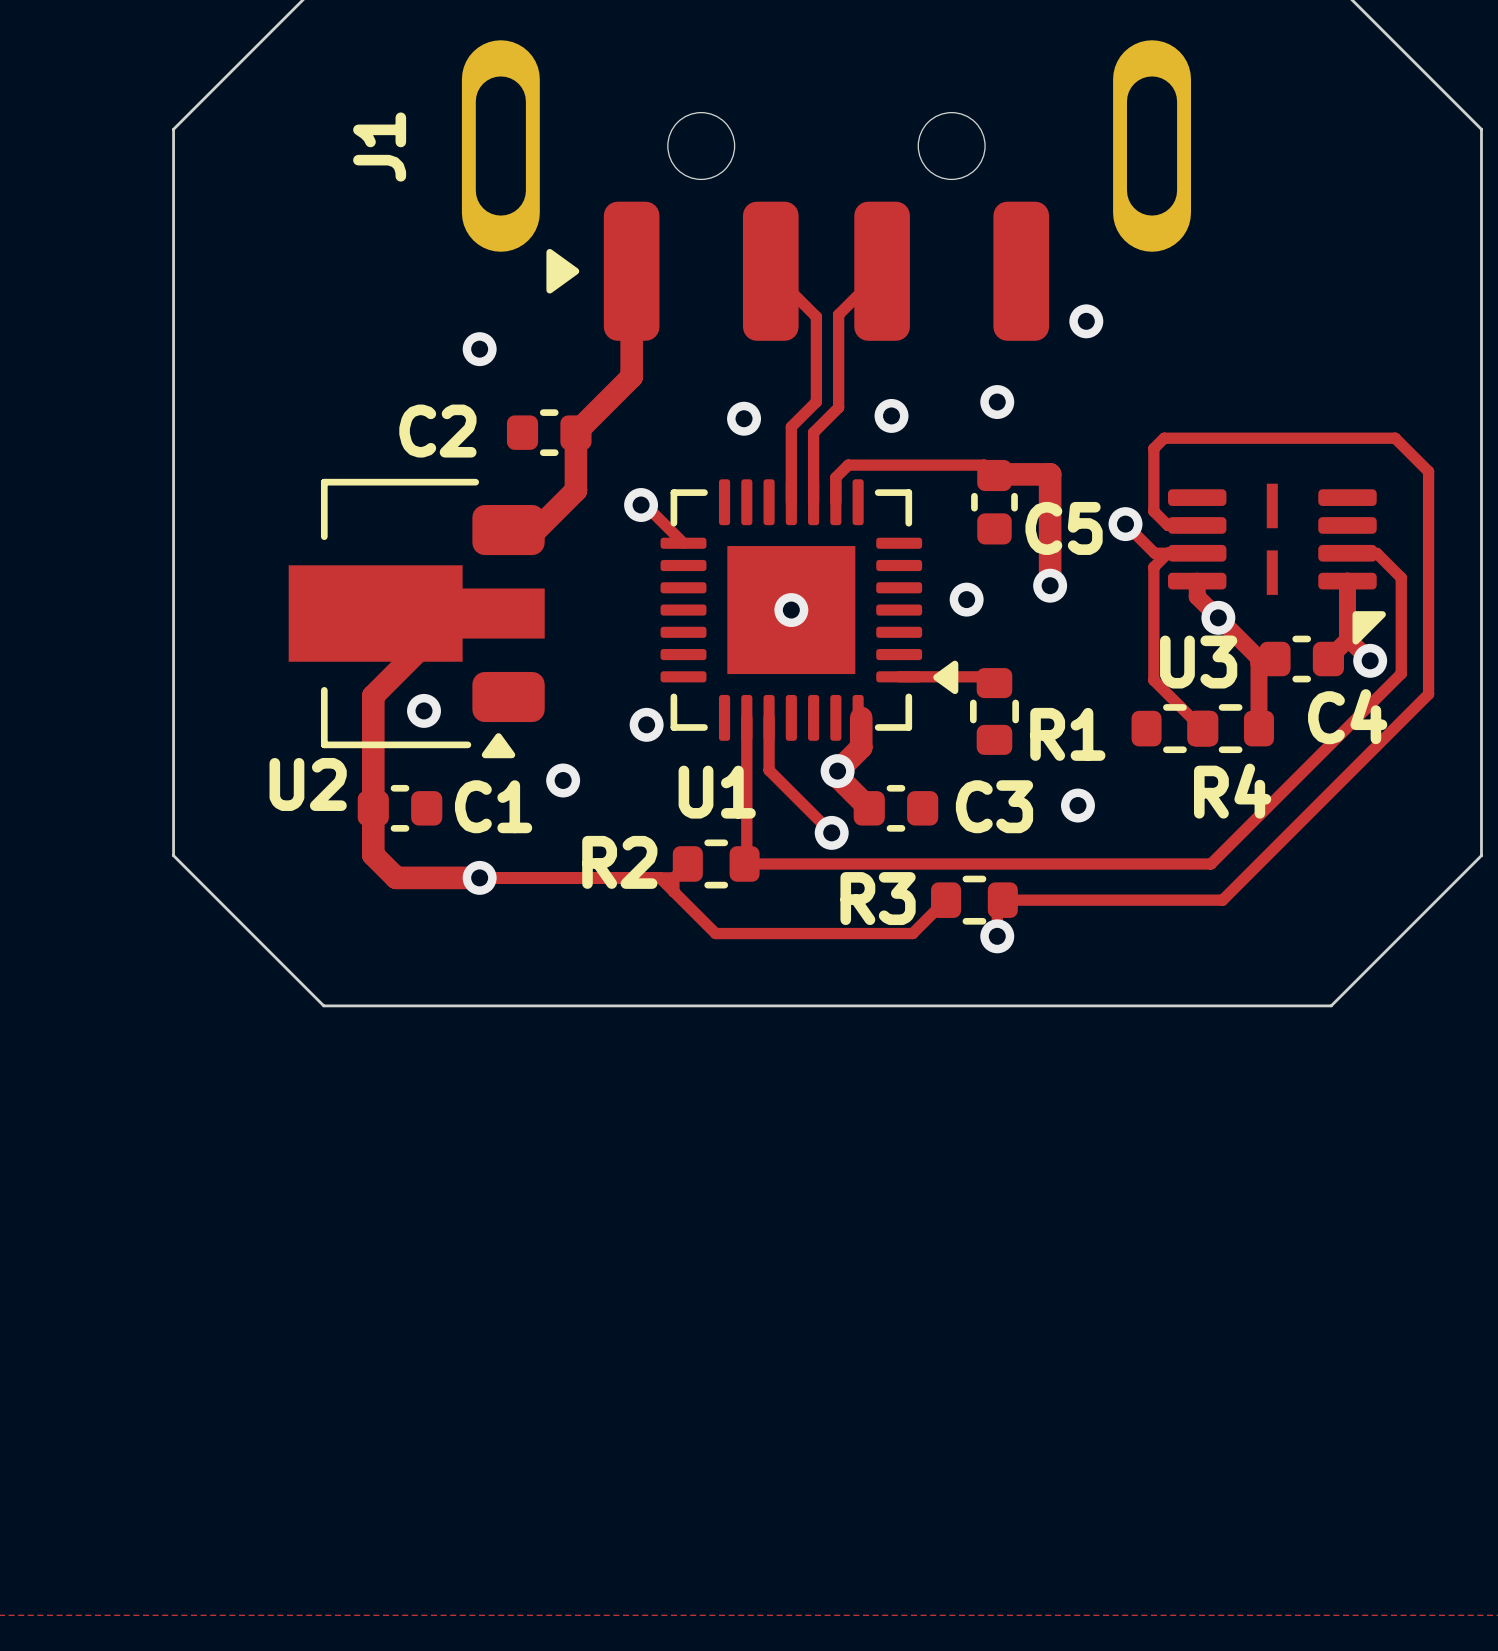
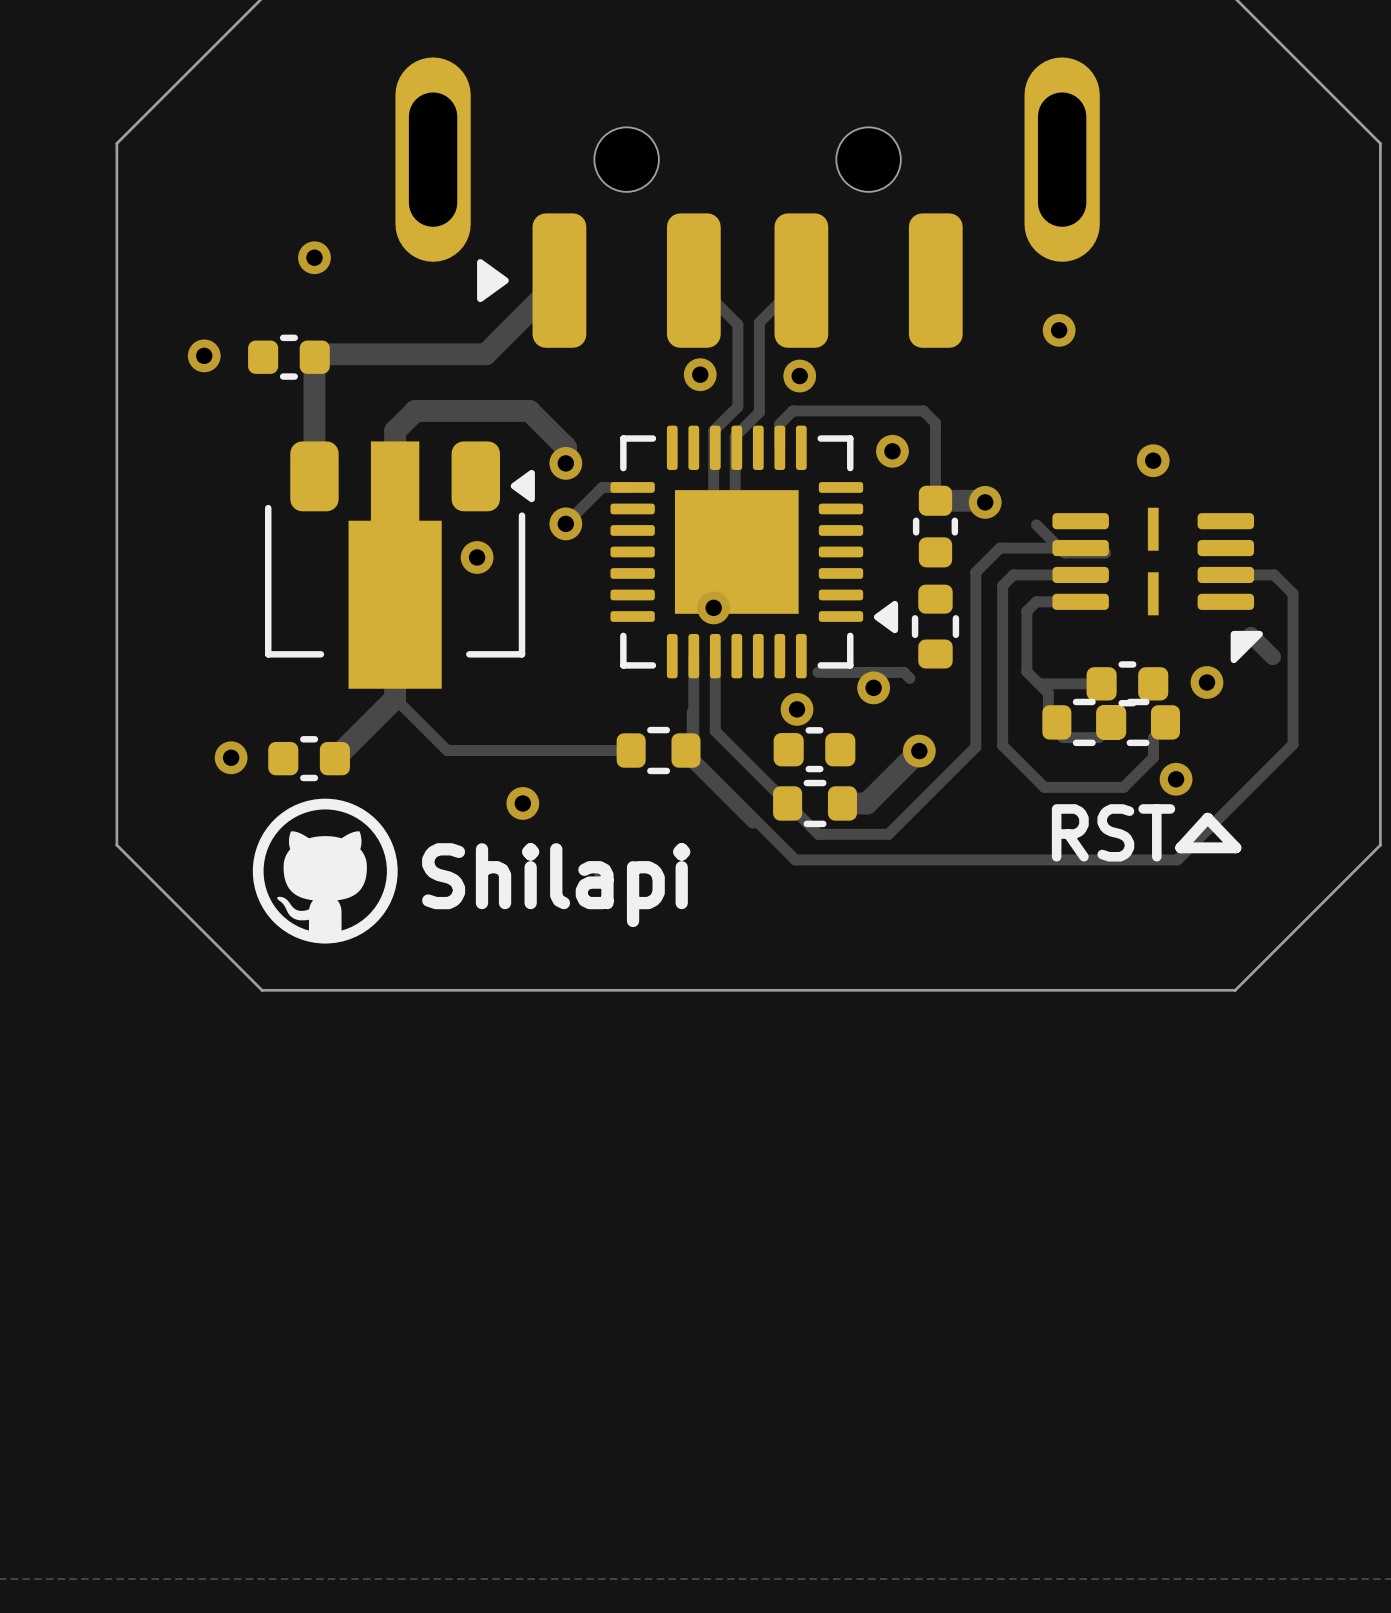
J1 name: J1 (379, 147) -> none
via: none -> (314, 257)
track: (631, 271) (631, 376) (575, 432) (575, 490) (536, 530) -> (559, 280) (485, 354) (314, 354) (314, 476)
via position: (1086, 321) -> (1059, 330)
via: none -> (204, 355)
via: (479, 349) -> none
part: none -> (288, 357)
via: none -> (700, 374)
via: none -> (799, 376)
via: (997, 402) -> none
via: (891, 415) -> none
via: (744, 418) -> none
C2: (549, 432) -> none
track: none -> (779, 447) (779, 423) (792, 410) (923, 410) (935, 423) (935, 500) (983, 500) (985, 502)
via: none -> (892, 451)
via: none -> (1153, 460)
track: none -> (565, 463) (565, 447) (529, 410) (415, 410) (395, 431) (395, 698)
via: none -> (565, 463)
track: none -> (632, 487) (602, 487) (565, 523)
via: none -> (985, 502)
track: (835, 502) (835, 477) (848, 465) (984, 465) (994, 475) (1050, 474) (1050, 585) -> none
C5 position: (994, 502) -> (935, 526)
track: (641, 504) (645, 504) (683, 543) -> none
via position: (641, 504) -> (565, 523)
via: (1125, 524) -> none
track: (1197, 525) (1167, 525) (1153, 511) (1153, 448) (1164, 438) (1395, 438) (1428, 471) (1428, 694) (1222, 900) (1002, 900) (997, 905) (997, 936) -> none
C5 name: C5 (1064, 528) -> none
track: none -> (1080, 548) (1000, 548) (975, 572) (975, 747) (888, 834) (818, 834) (715, 731) (715, 656)
part: none -> (754, 551)
track: (1167, 553) (1153, 567) (1153, 680) (1202, 728) -> none
track: (1347, 553) (1376, 553) (1401, 577) (1401, 673) (1211, 863) (744, 863) (746, 861) (746, 717) -> none
via: none -> (477, 557)
U3 position: (1276, 564) -> (1157, 585)
part: none -> (399, 565)
track: none -> (1080, 574) (1013, 574) (1002, 585) (1002, 745) (1044, 787) (1123, 787) (1153, 757) (1153, 737)
track: none -> (1225, 574) (1274, 574) (1293, 593) (1293, 744) (1177, 859) (795, 859) (686, 750) (693, 742) (693, 656)
track: (1197, 581) (1197, 596) (1259, 659) -> none
track: (1347, 581) (1347, 639) (1328, 659) -> none
via: (1050, 585) -> none
via: (966, 599) -> none
track: none -> (1080, 601) (1036, 601) (1026, 611) (1026, 671) (1048, 693) (1048, 722) (1063, 737) (1098, 737) (1101, 734)
U1: (809, 610) -> none
track: (531, 613) (455, 613) (373, 695) (373, 855) (396, 877) (673, 877) (687, 863) -> none
via: (1218, 617) -> none
U2: (416, 618) -> none
part: none -> (935, 626)
C4: (1301, 659) -> none
via: (1370, 660) -> none
U3 name: U3 (1198, 662) -> none
track: (1258, 663) (1258, 728) -> none
via: none -> (1207, 682)
track: none -> (1038, 683) (1101, 683) (1098, 686)
part: none -> (1127, 683)
via: none -> (873, 687)
track: none -> (395, 698) (334, 758)
track: none -> (395, 698) (447, 750) (631, 750)
via: (424, 710) -> none
R1: (994, 711) -> none
via: none -> (797, 709)
track: (861, 717) (861, 747) (837, 771) (837, 776) (869, 808) -> none
via: (646, 724) -> none
part: none -> (658, 750)
track: none -> (919, 751) (866, 803) (842, 803)
via: none -> (919, 751)
via: none -> (231, 757)
via: (837, 771) -> none
via position: (563, 780) -> (522, 803)
via: none -> (1176, 779)
R4 name: R4 (1232, 791) -> none
via: (1077, 805) -> none
C1 name: C1 (493, 806) -> none
C3 name: C3 (994, 806) -> none
drawing: none -> [252, 798, 398, 944]
C1 position: (400, 808) -> (309, 758)
C3 position: (895, 808) -> (814, 749)
part: none -> (815, 803)
line: none -> (1207, 818) (1180, 847) (1235, 847) (1207, 818)
via: (831, 832) -> none
text: none -> RST (1113, 832)
R2: (716, 863) -> none
via: (479, 877) -> none
track: (659, 877) (715, 933) (912, 933) (946, 900) -> none
text: none -> Shilapi (556, 885)
R3: (974, 900) -> none
via: (997, 936) -> none

